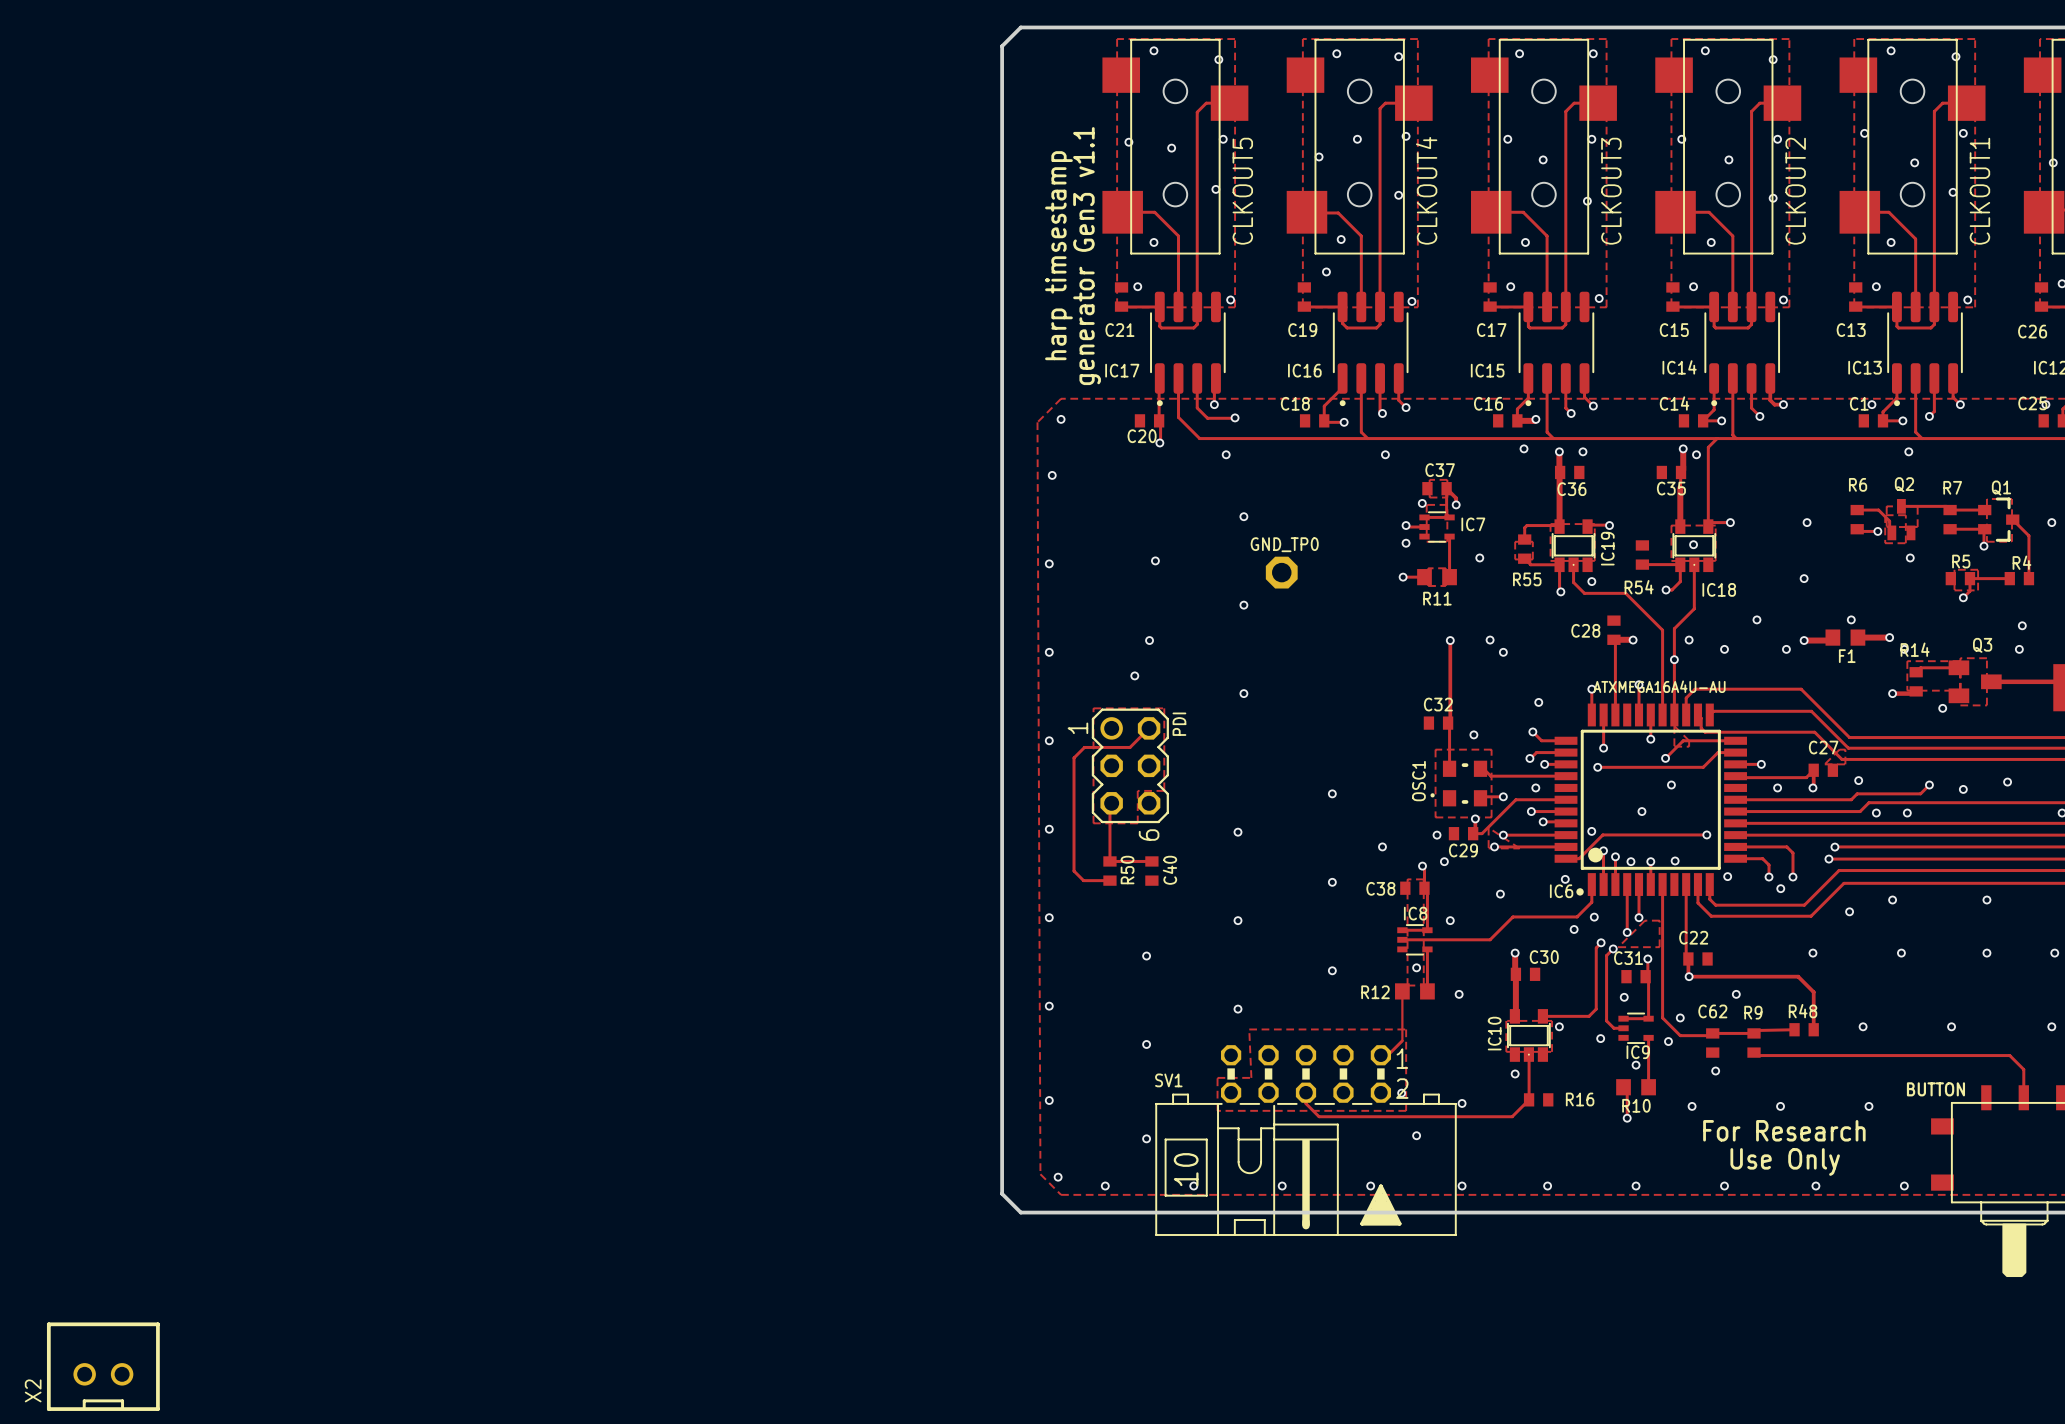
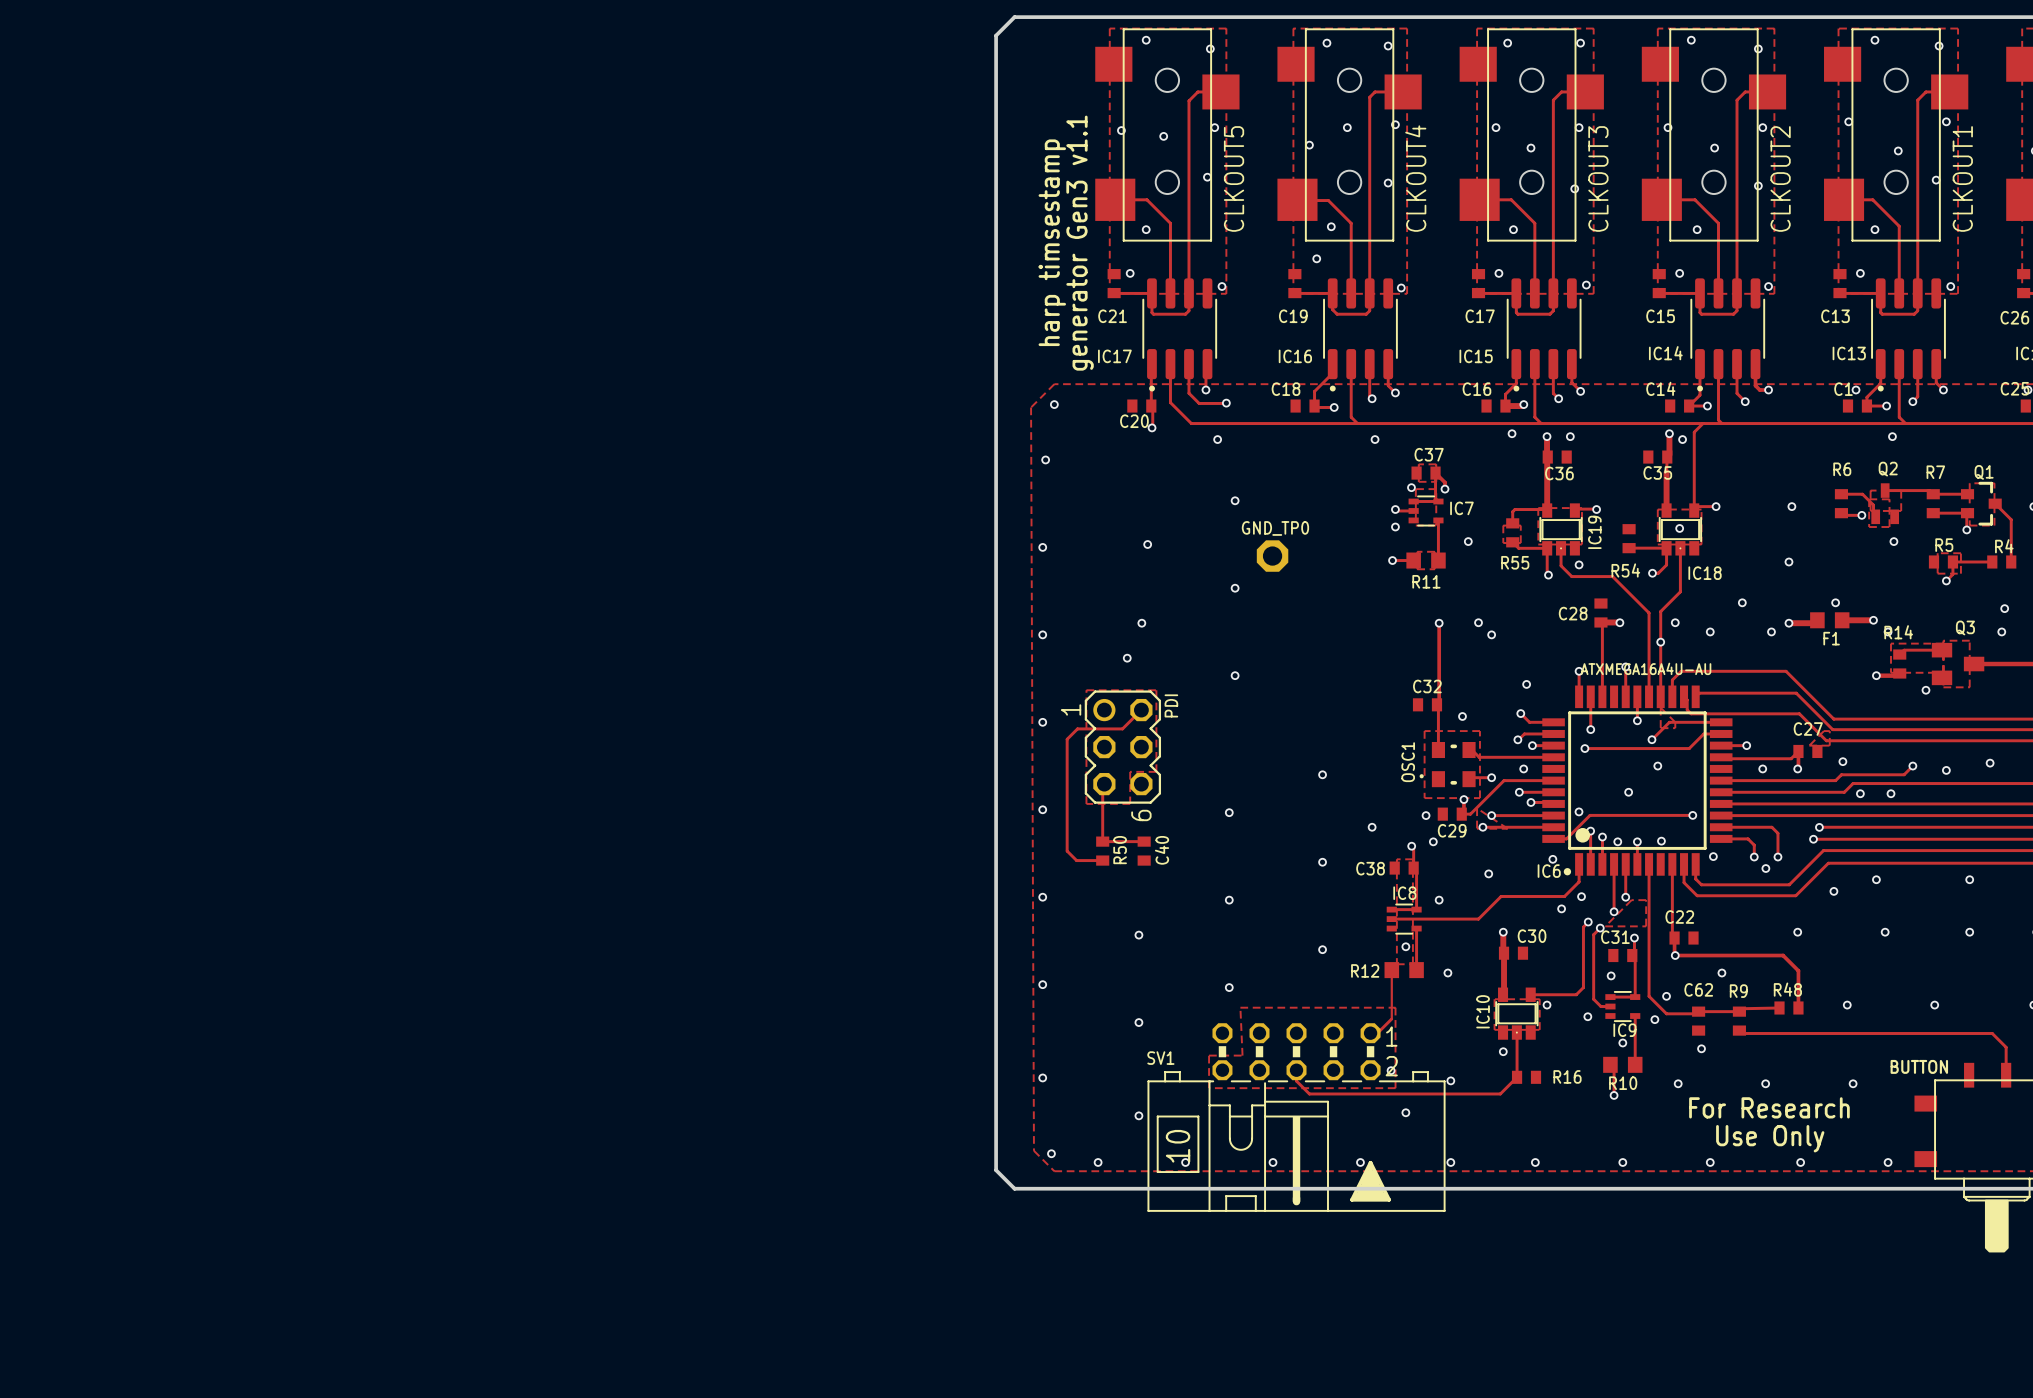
X2: (103, 1366) -> none

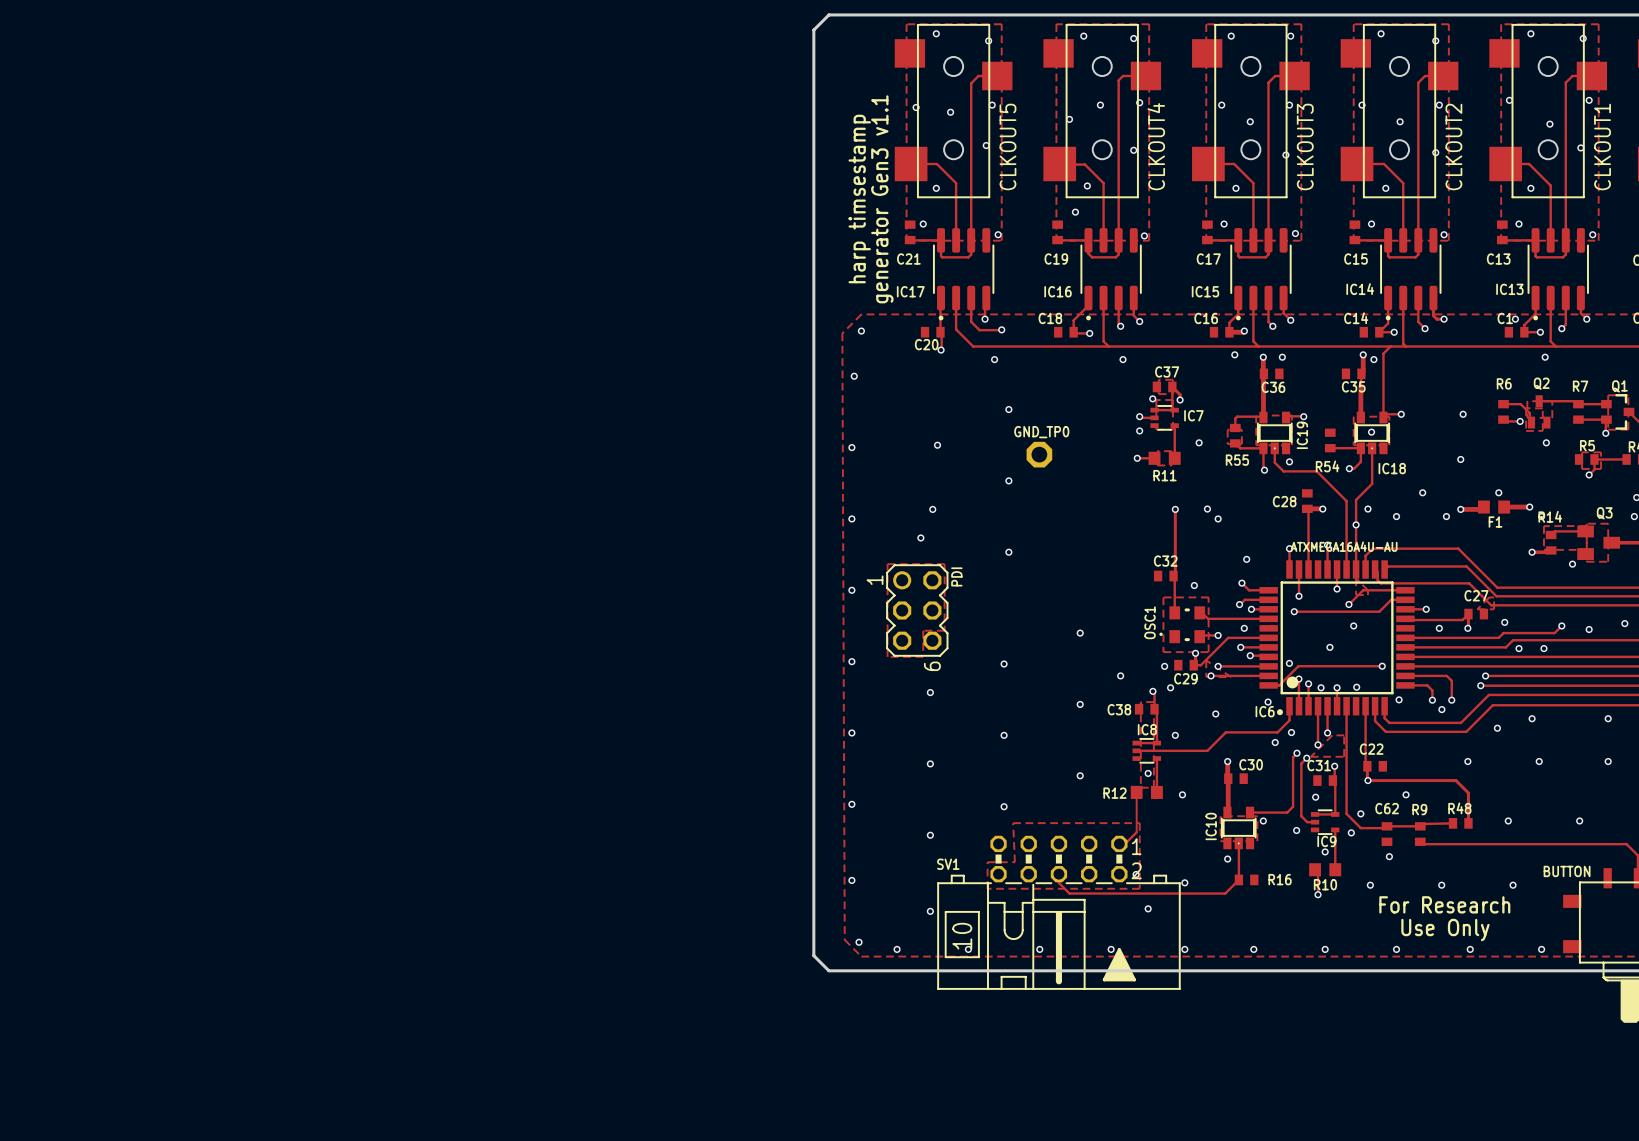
track: (1141, 710) (1122, 728) (1077, 728) (1067, 739) (1067, 851) (1076, 860) (1102, 860) -> none
track: (1104, 784) (1102, 785) (1102, 841) -> none
track: (1102, 839) (1105, 841) (1144, 841) -> none
via: none -> (930, 692)
R50: (1102, 851) -> none
C40: (1144, 851) -> none

